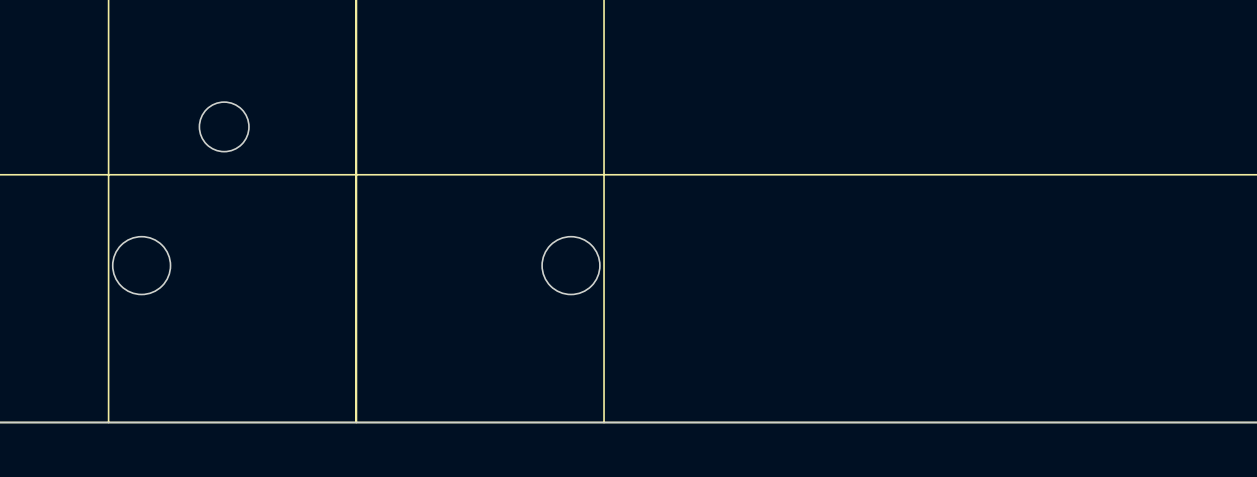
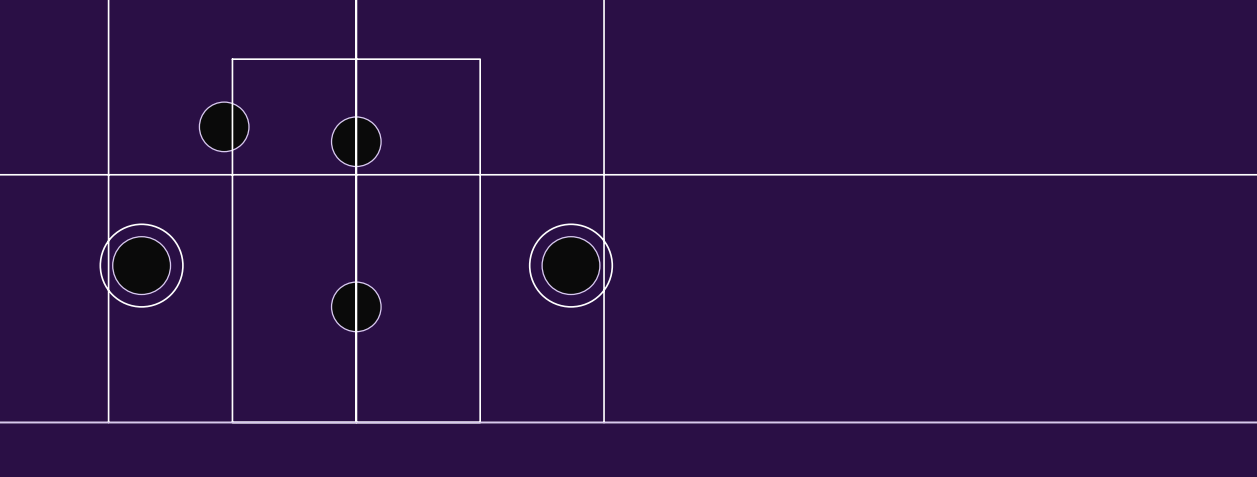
drawing: none -> [99, 223, 184, 308]
drawing: none -> [528, 223, 614, 308]
part: none -> (356, 240)

